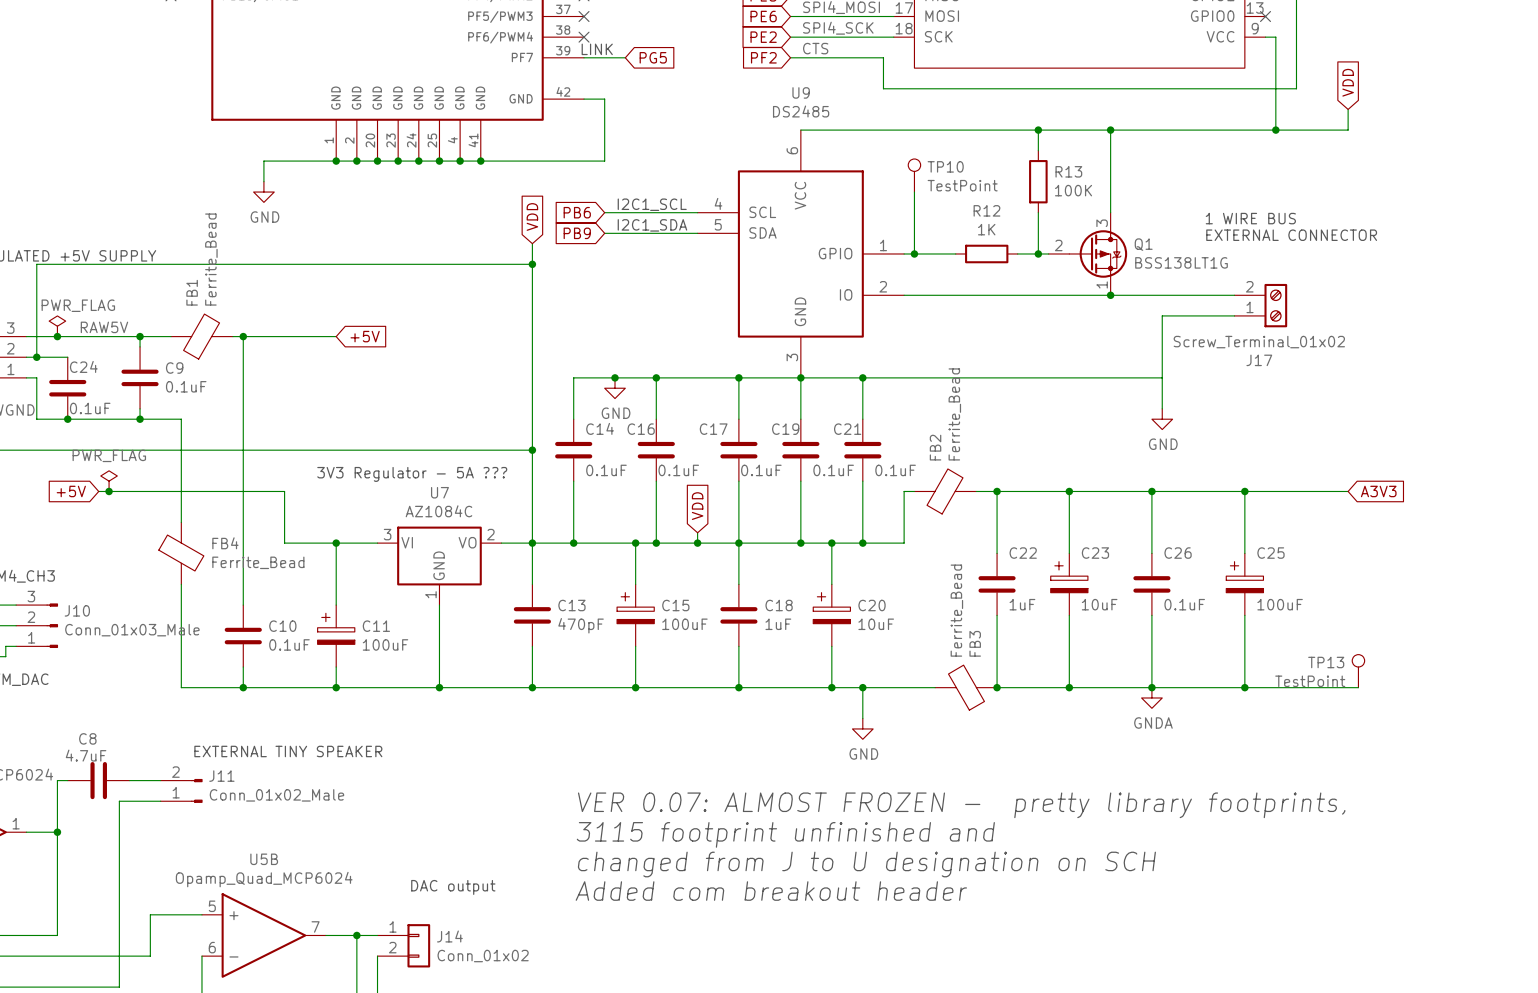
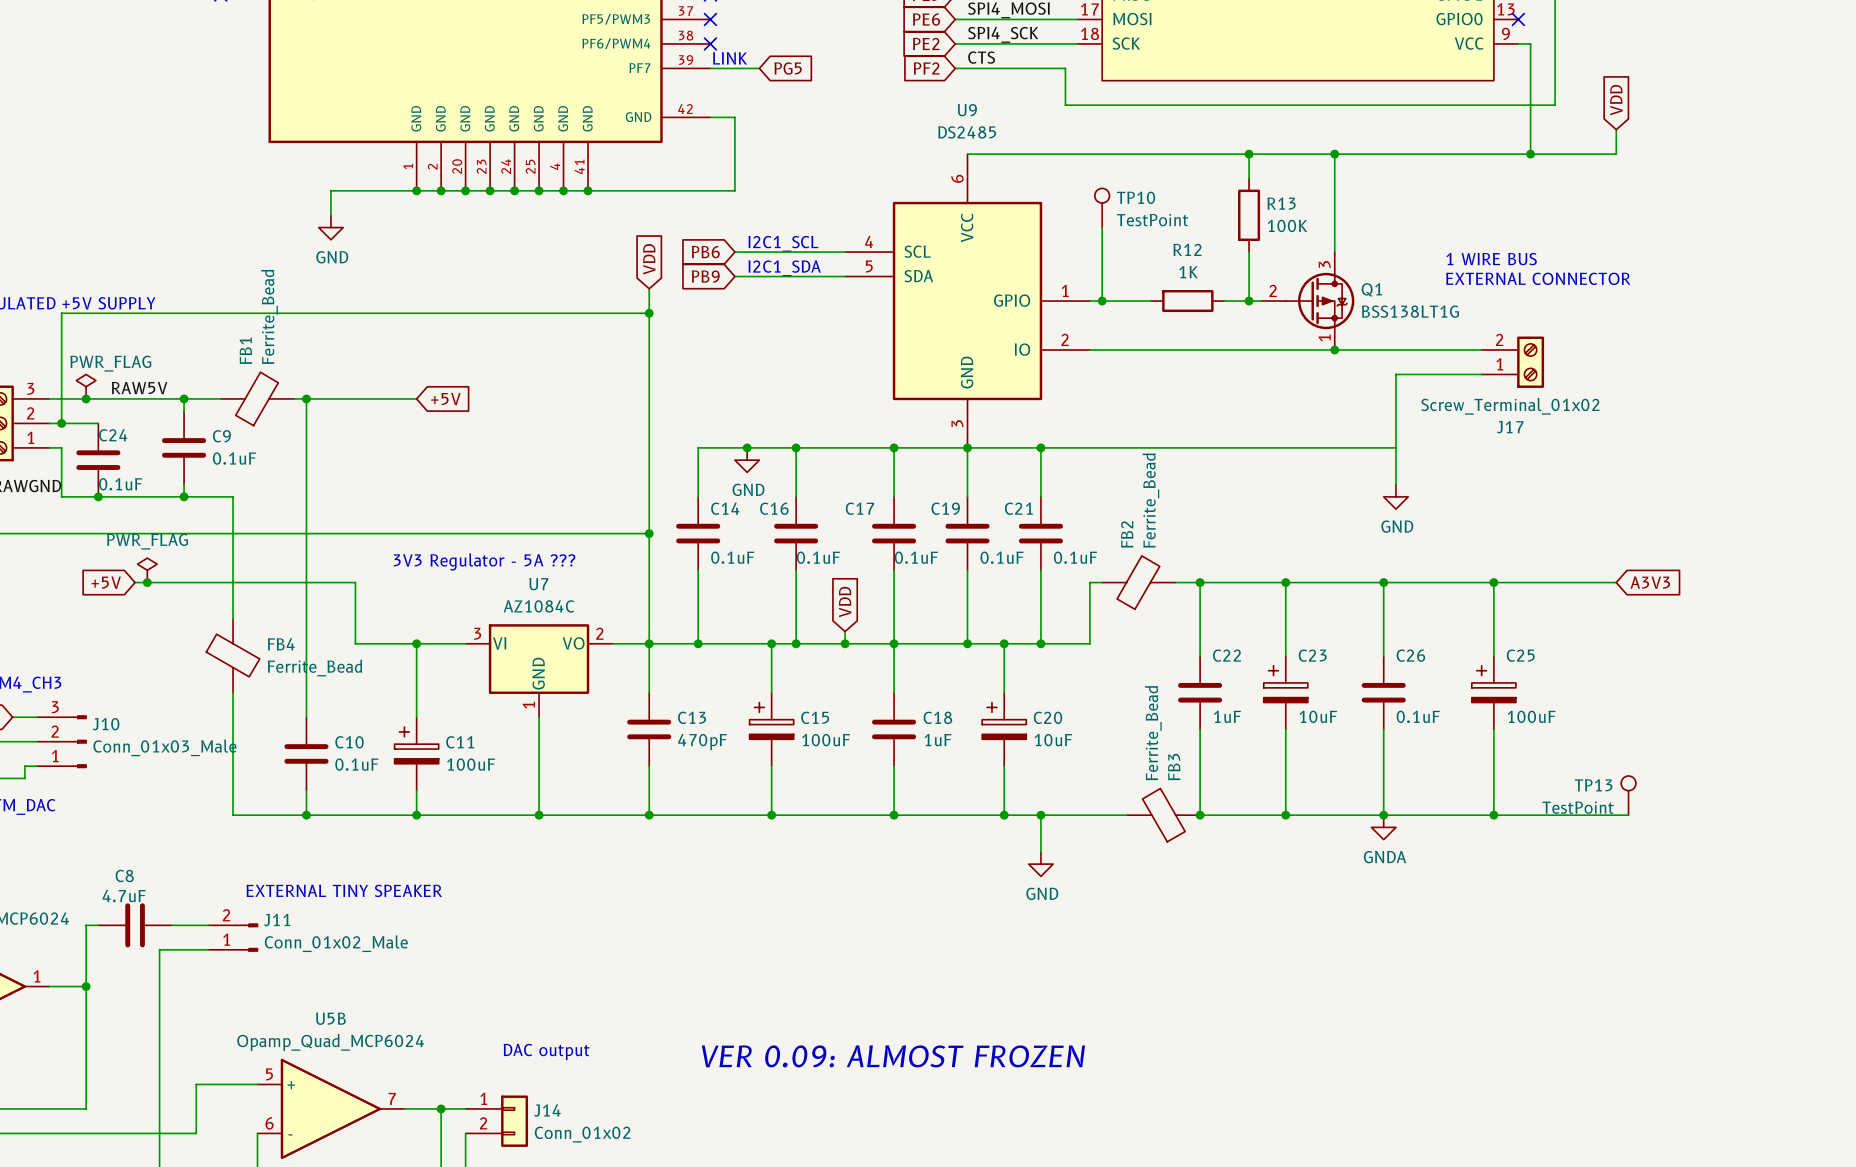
text: VER 0.07: ALMOST FROZEN - pretty library footprints, (961, 805) -> none
text: 3115 footprint unfinished and (785, 834) -> none
text: changed from J to U designation on SCH (866, 864) -> none
text: Added com breakout header (771, 891) -> VER 0.09: ALMOST FROZEN (893, 1056)

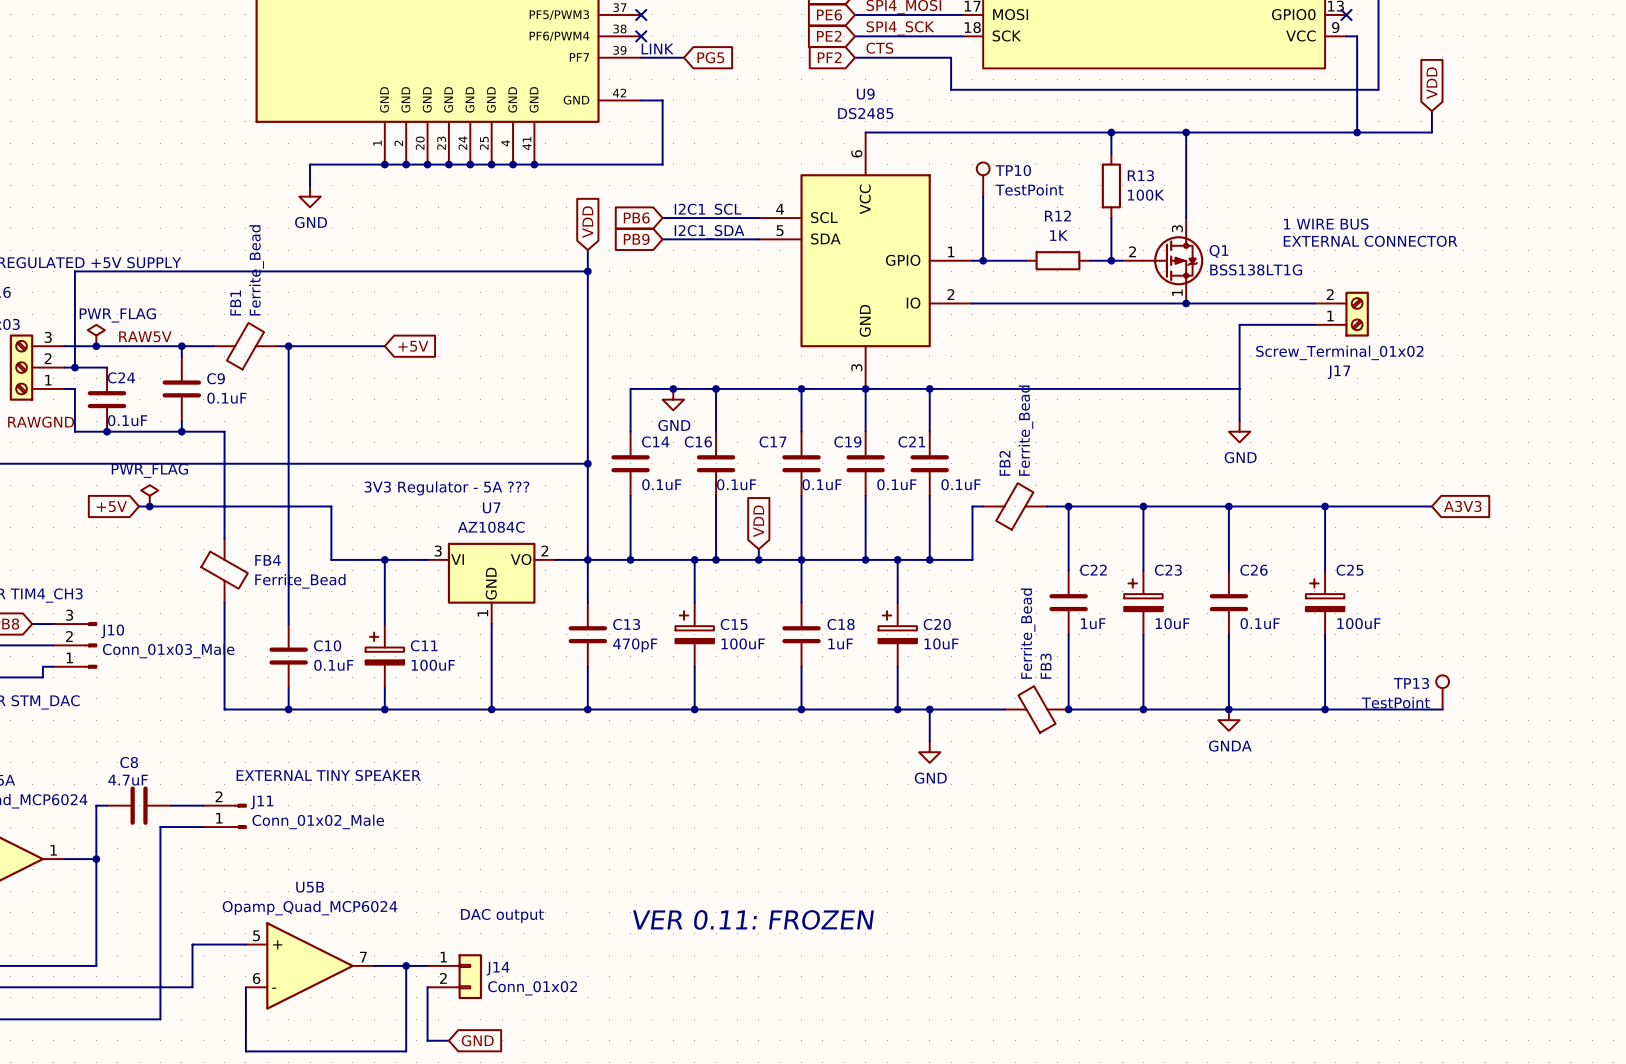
text: VER 0.09: ALMOST FROZEN (893, 1056) -> VER 0.11: FROZEN (753, 919)

